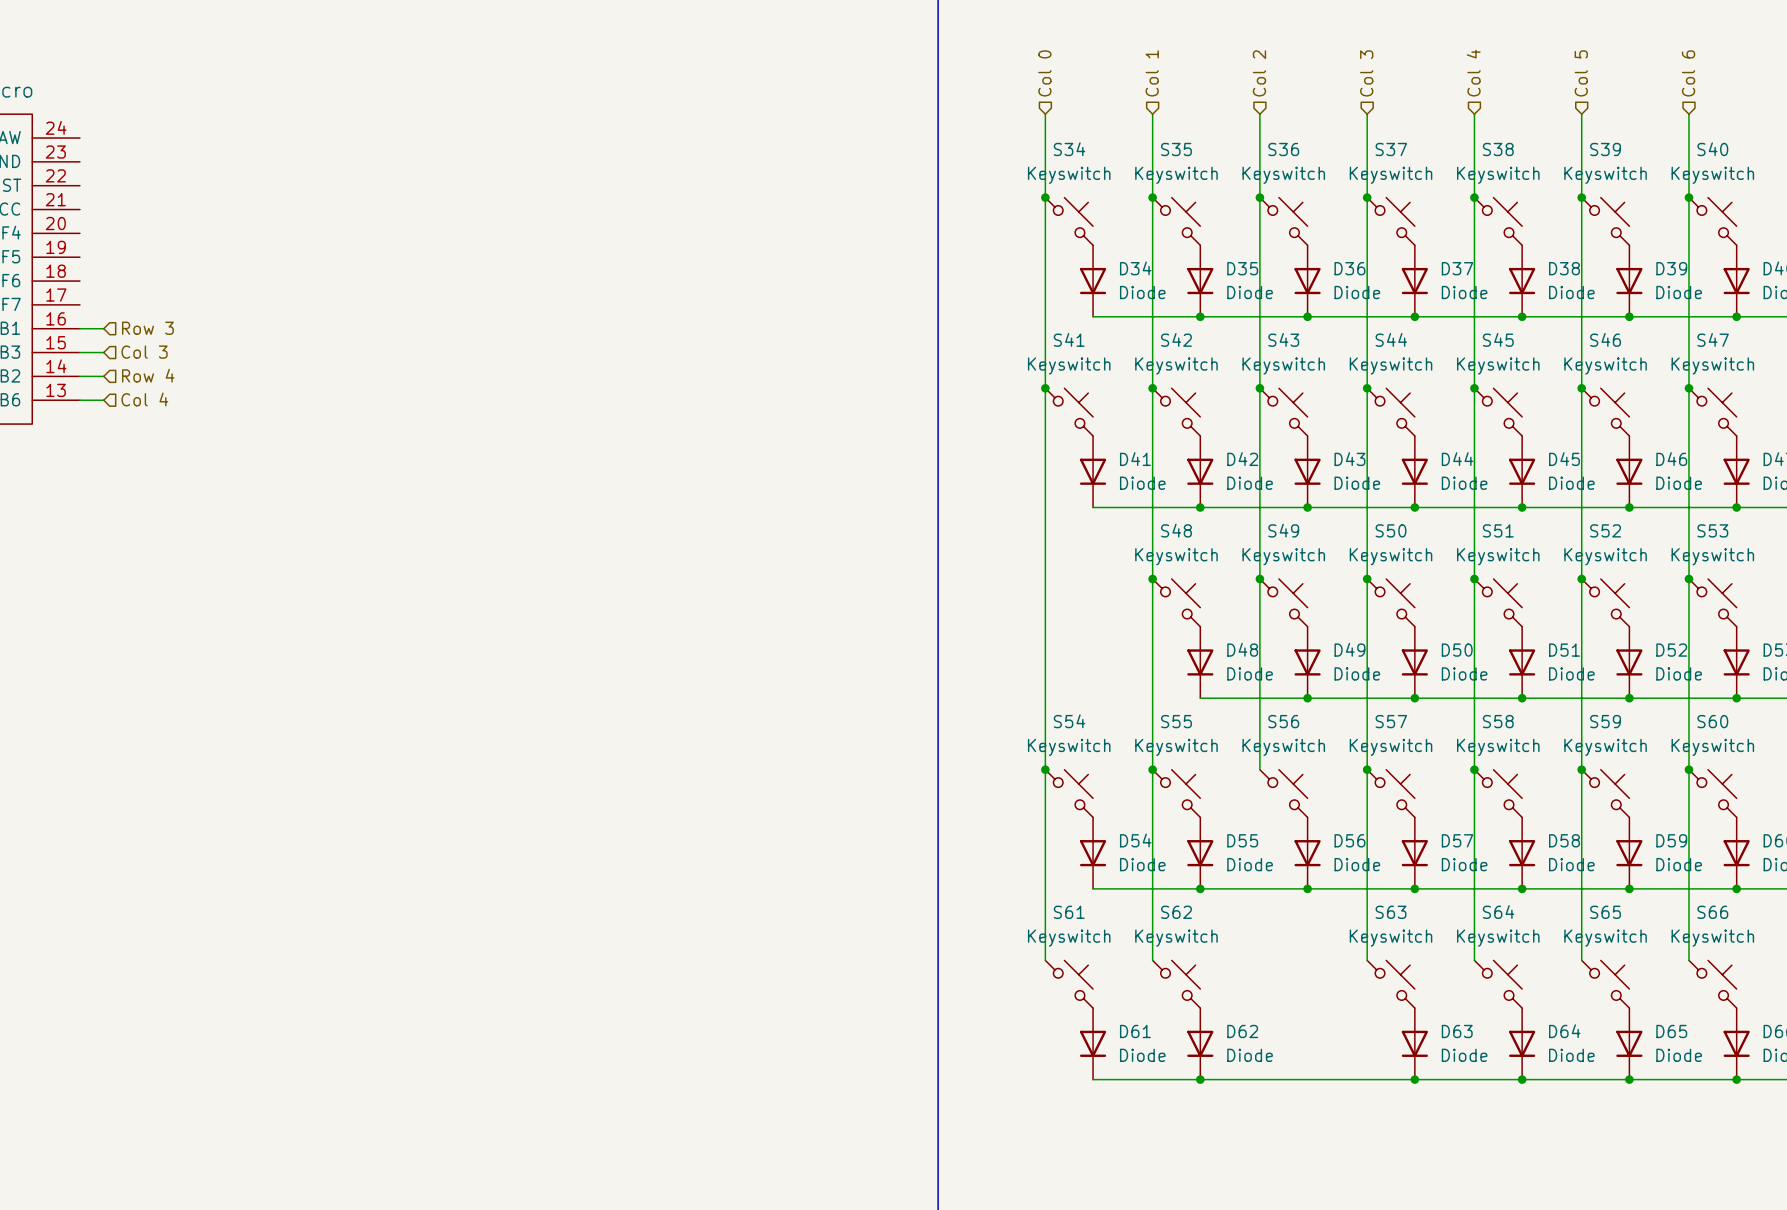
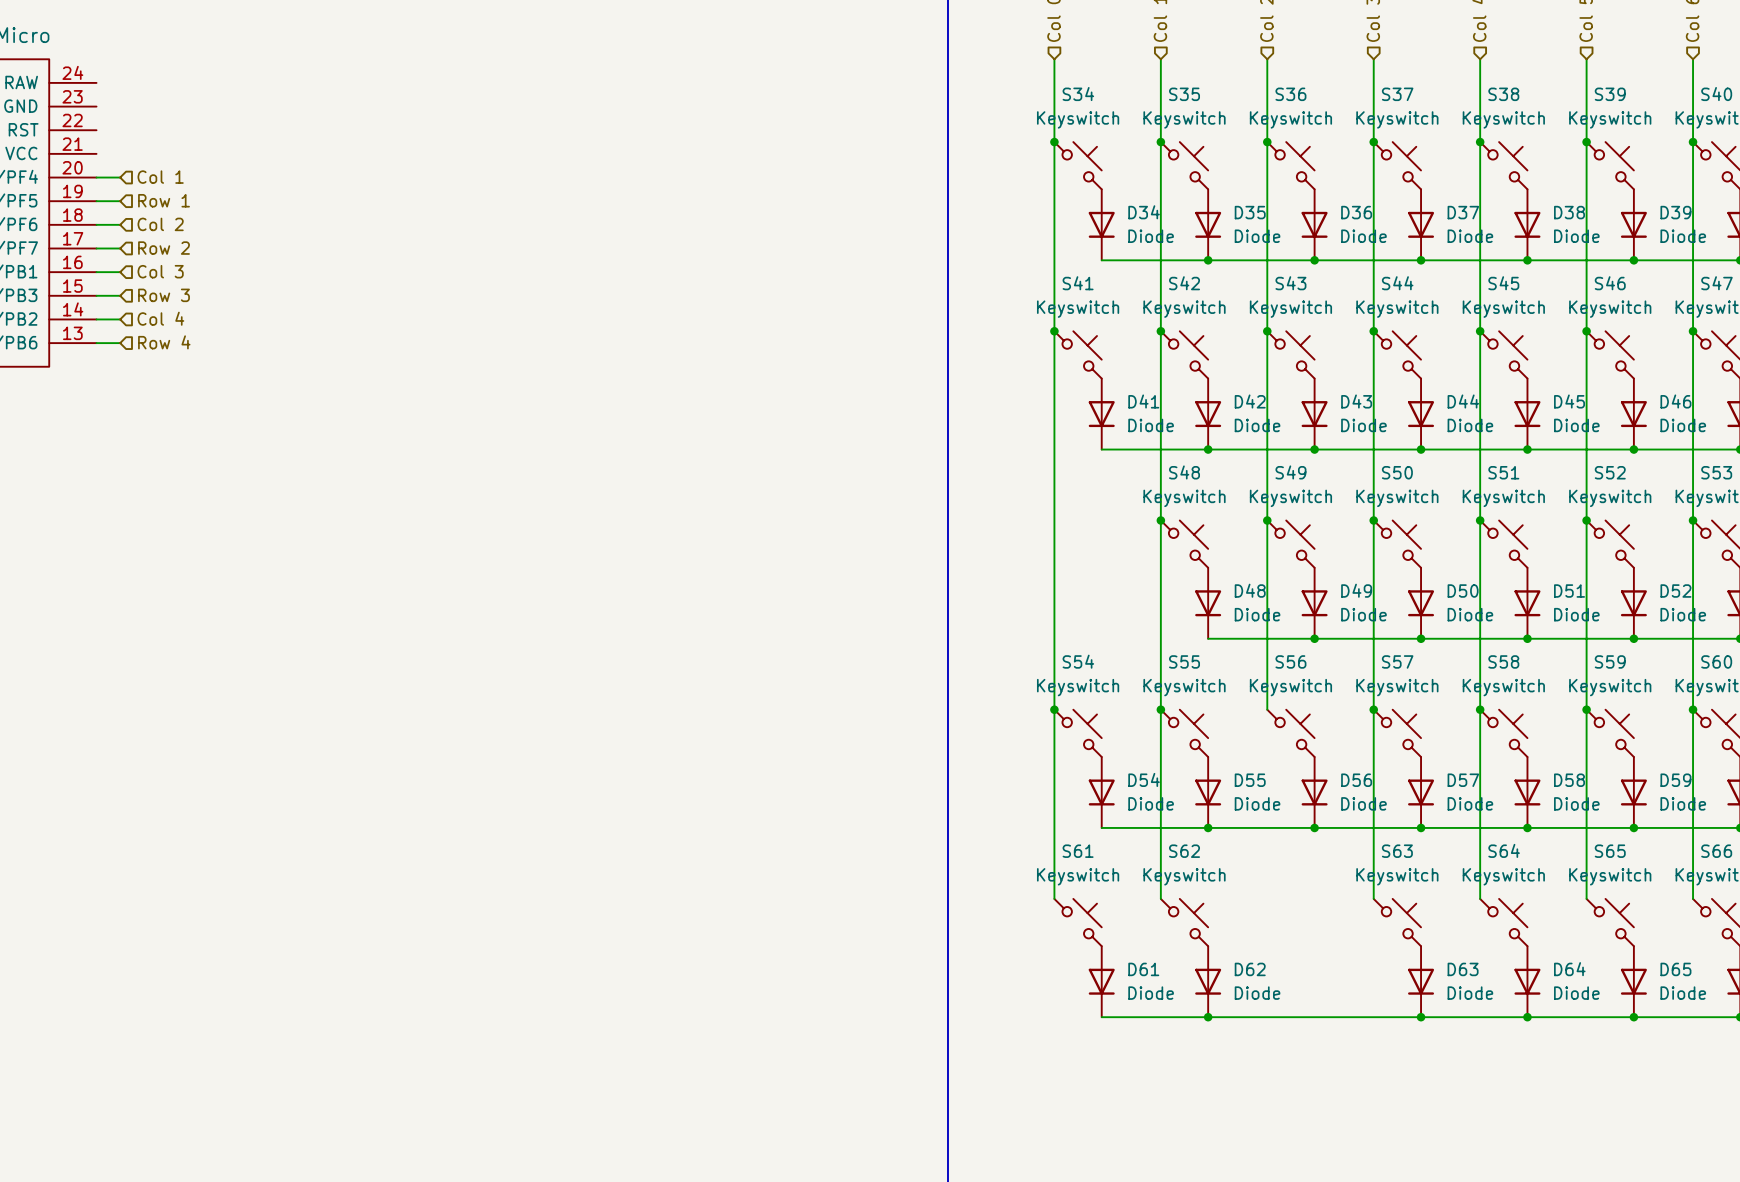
hierarchical label: none -> Col 1 (160, 177)
wire: none -> (96, 177) (120, 177)
hierarchical label: none -> Row 1 (164, 200)
wire: none -> (96, 201) (120, 201)
hierarchical label: none -> Col 2 (160, 224)
wire: none -> (96, 224) (120, 224)
wire: none -> (96, 248) (120, 248)
hierarchical label: none -> Row 2 (164, 248)
hierarchical label: Row 3 (147, 328) -> Col 3 (160, 271)
hierarchical label: Col 3 (144, 352) -> Row 3 (164, 295)
hierarchical label: Row 4 (148, 375) -> Col 4 (160, 318)
hierarchical label: Col 4 (144, 399) -> Row 4 (164, 342)

